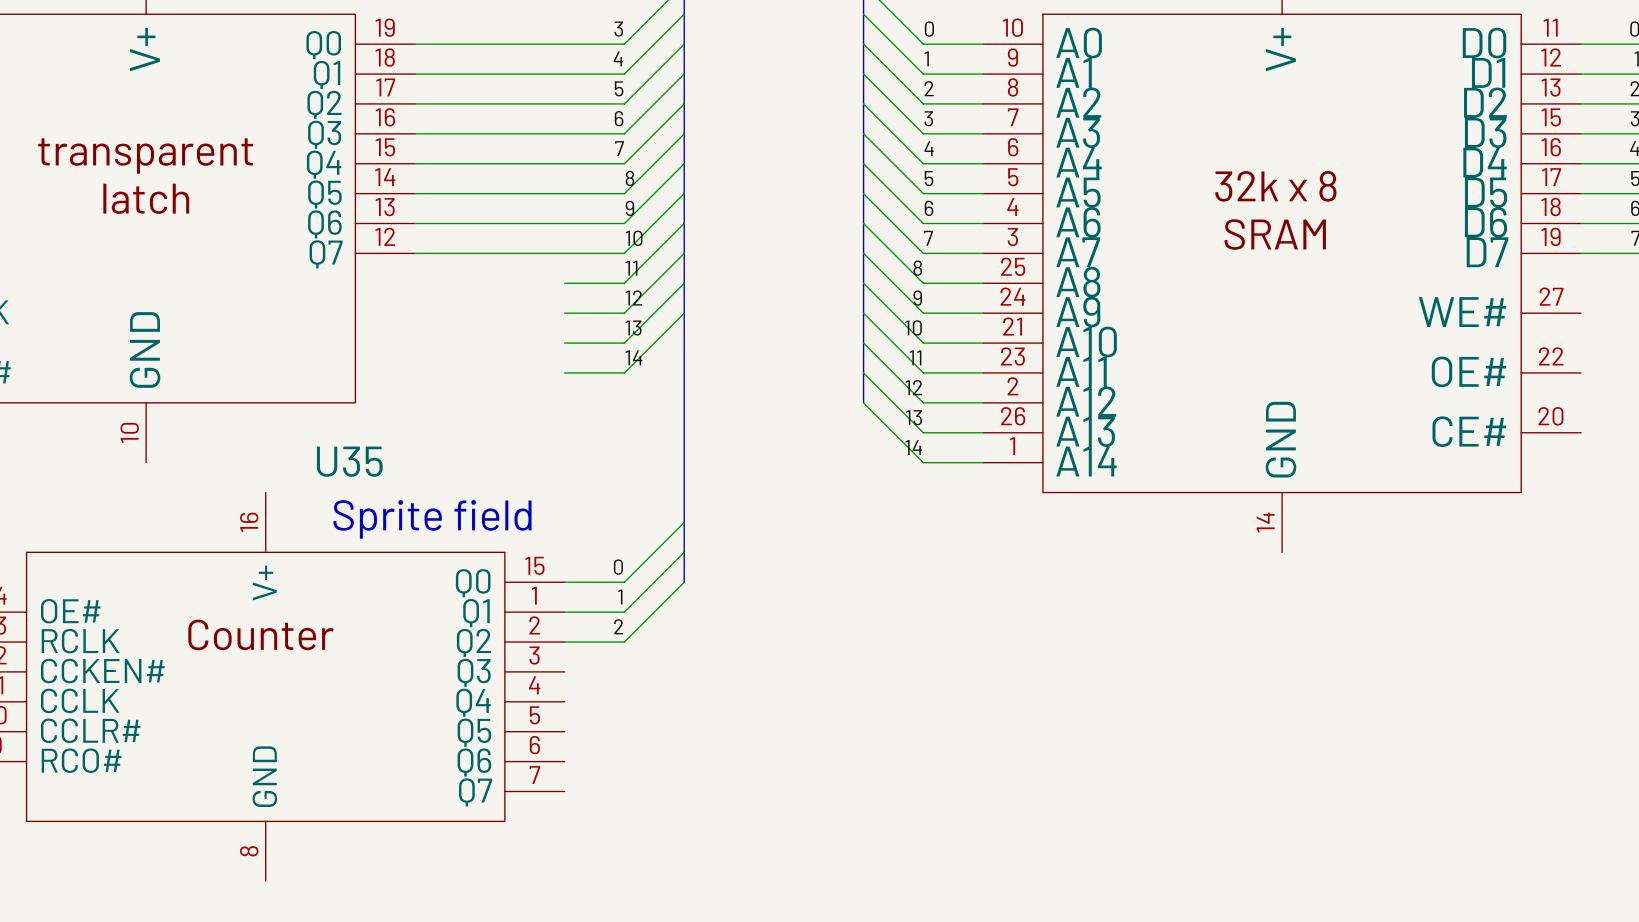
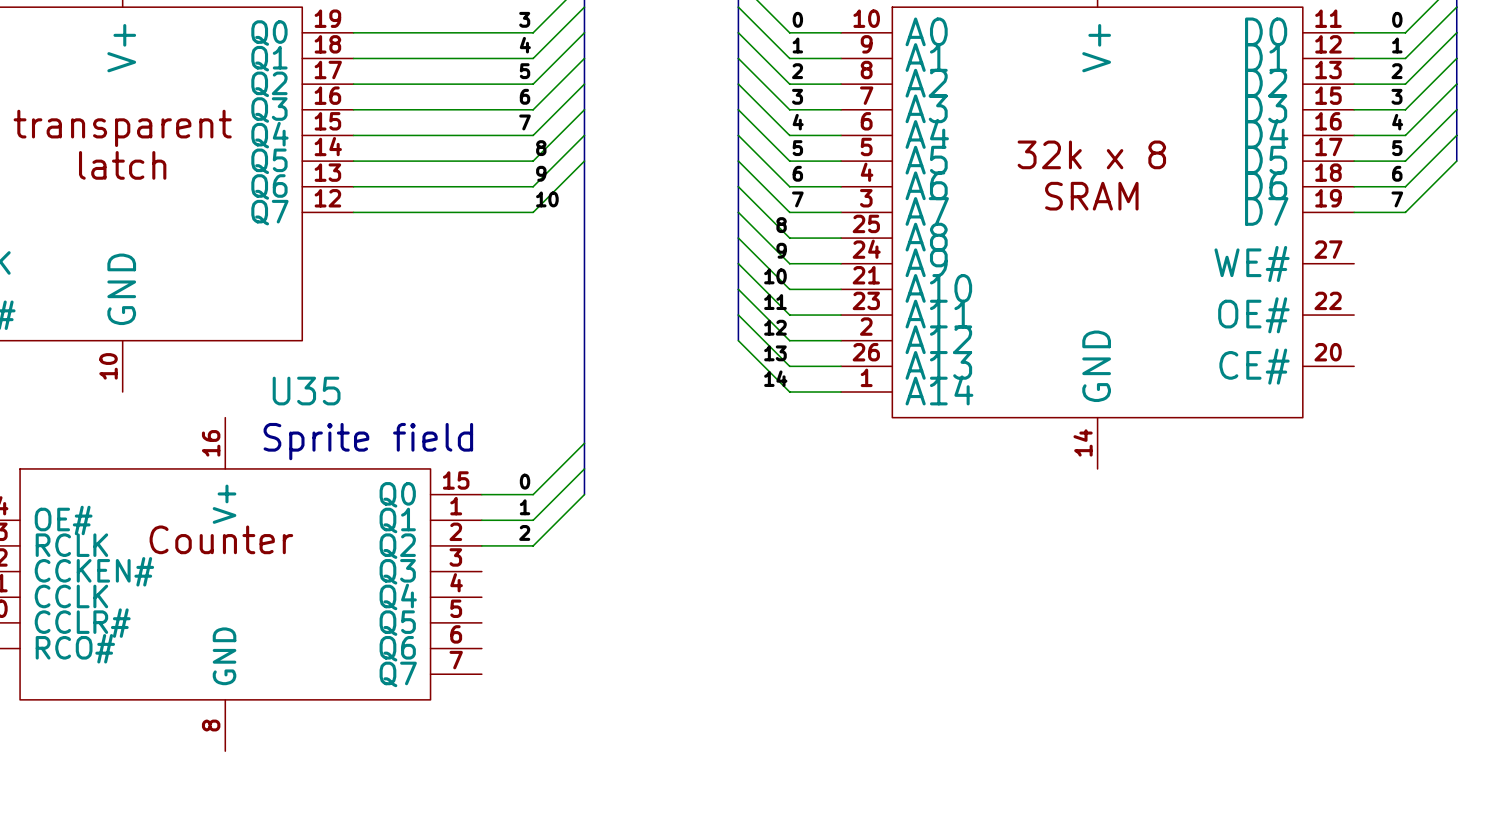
wire: (684, 223) (624, 283) (564, 283) -> none
wire: (684, 253) (624, 313) (564, 313) -> none
label: 11 (631, 268) -> none
wire: (684, 283) (624, 343) (564, 343) -> none
label: 12 (633, 297) -> none
wire: (684, 313) (624, 372) (564, 372) -> none
label: 13 (633, 328) -> none
label: 14 (634, 357) -> none

